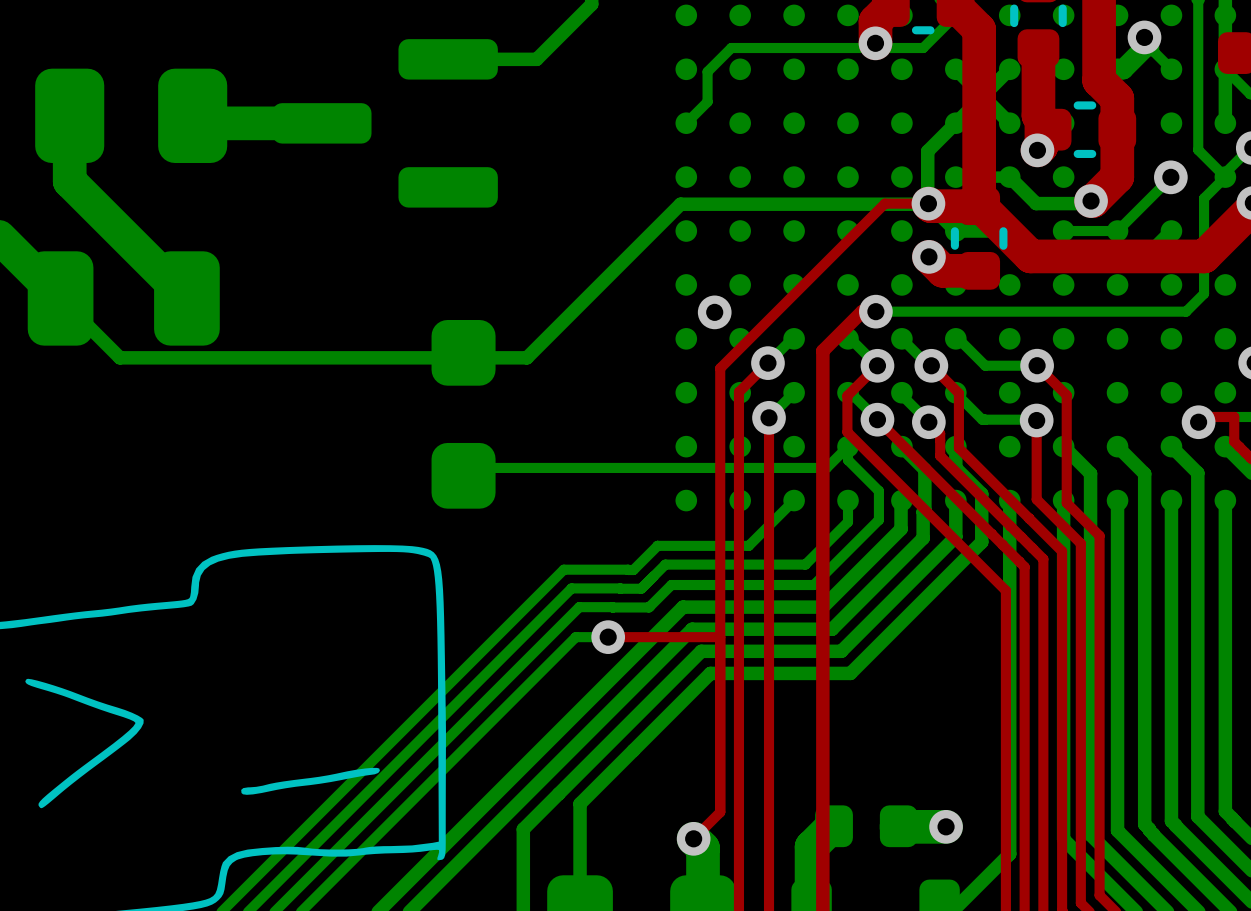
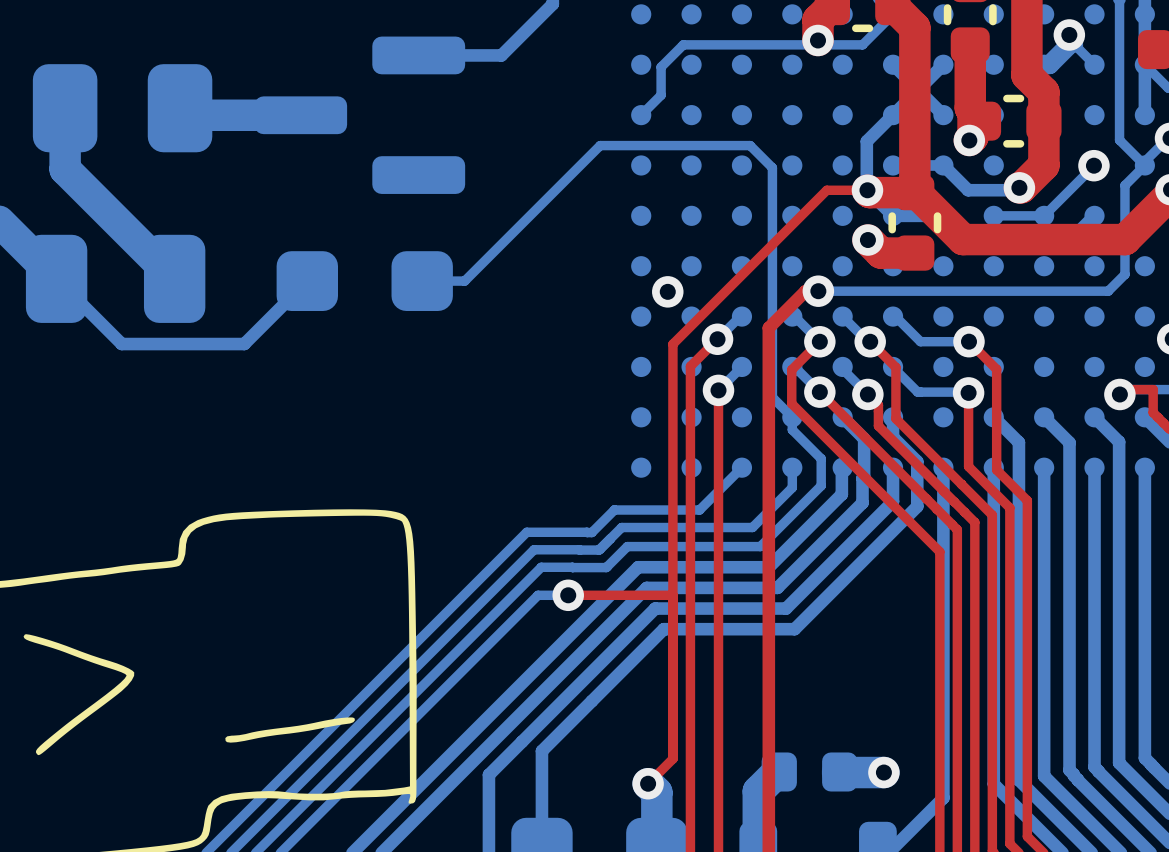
bottom track: (929, 204) (680, 204) (526, 357) (119, 357) -> (307, 281) (244, 344) (121, 344) (112, 334)
part rotation: 0° (463, 414) -> 90° clockwise (364, 281)
part position: (463, 414) -> (364, 281)
bottom track: (848, 446) (826, 467) (471, 467) -> (792, 417) (772, 397) (772, 167) (750, 145) (600, 145) (464, 281) (422, 281)

